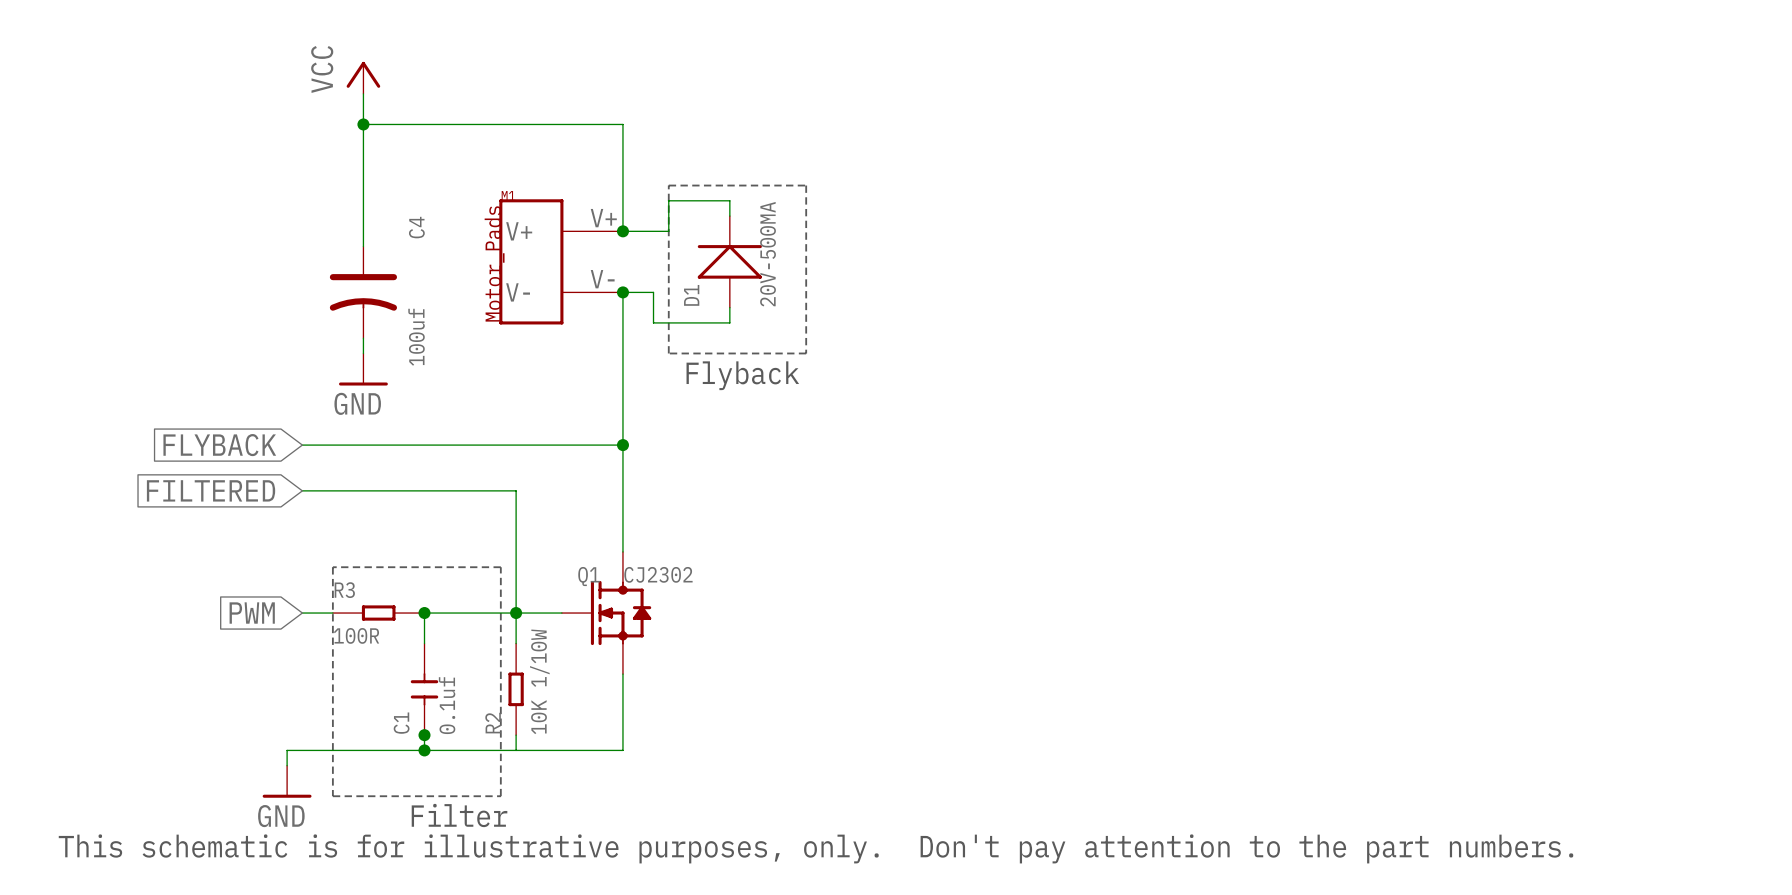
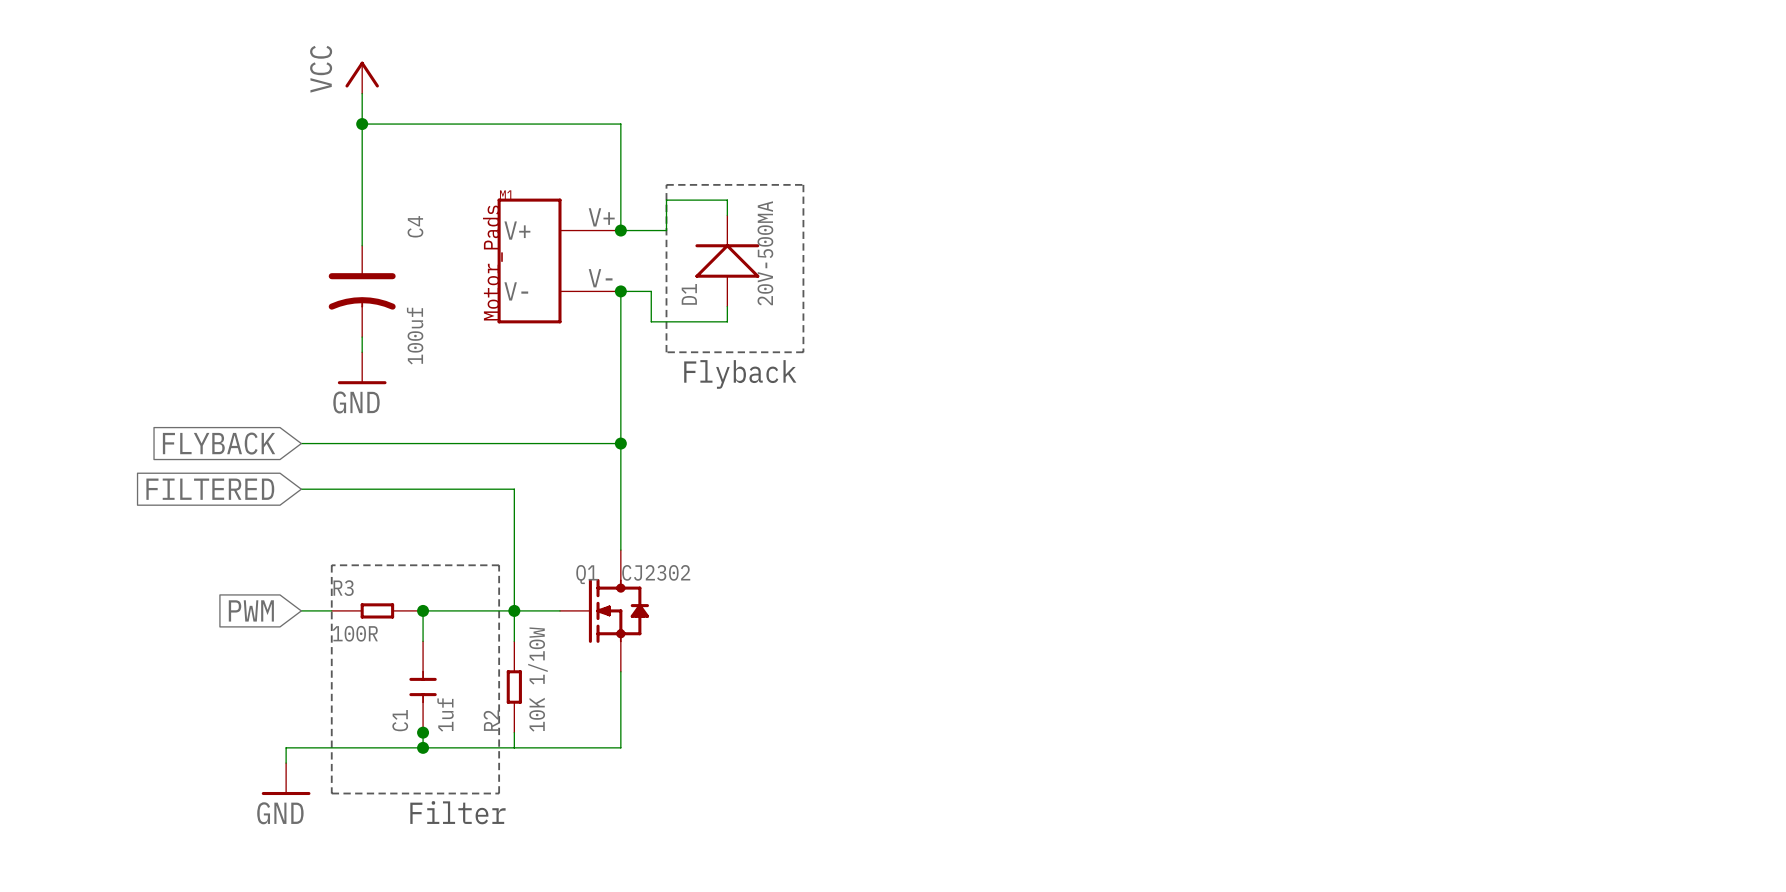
C1 value: 0.1uf (447, 705) -> 1uf (445, 715)
text: This schematic is for illustrative purposes, only. Don't pay attention to the part numbers. (816, 848) -> none

